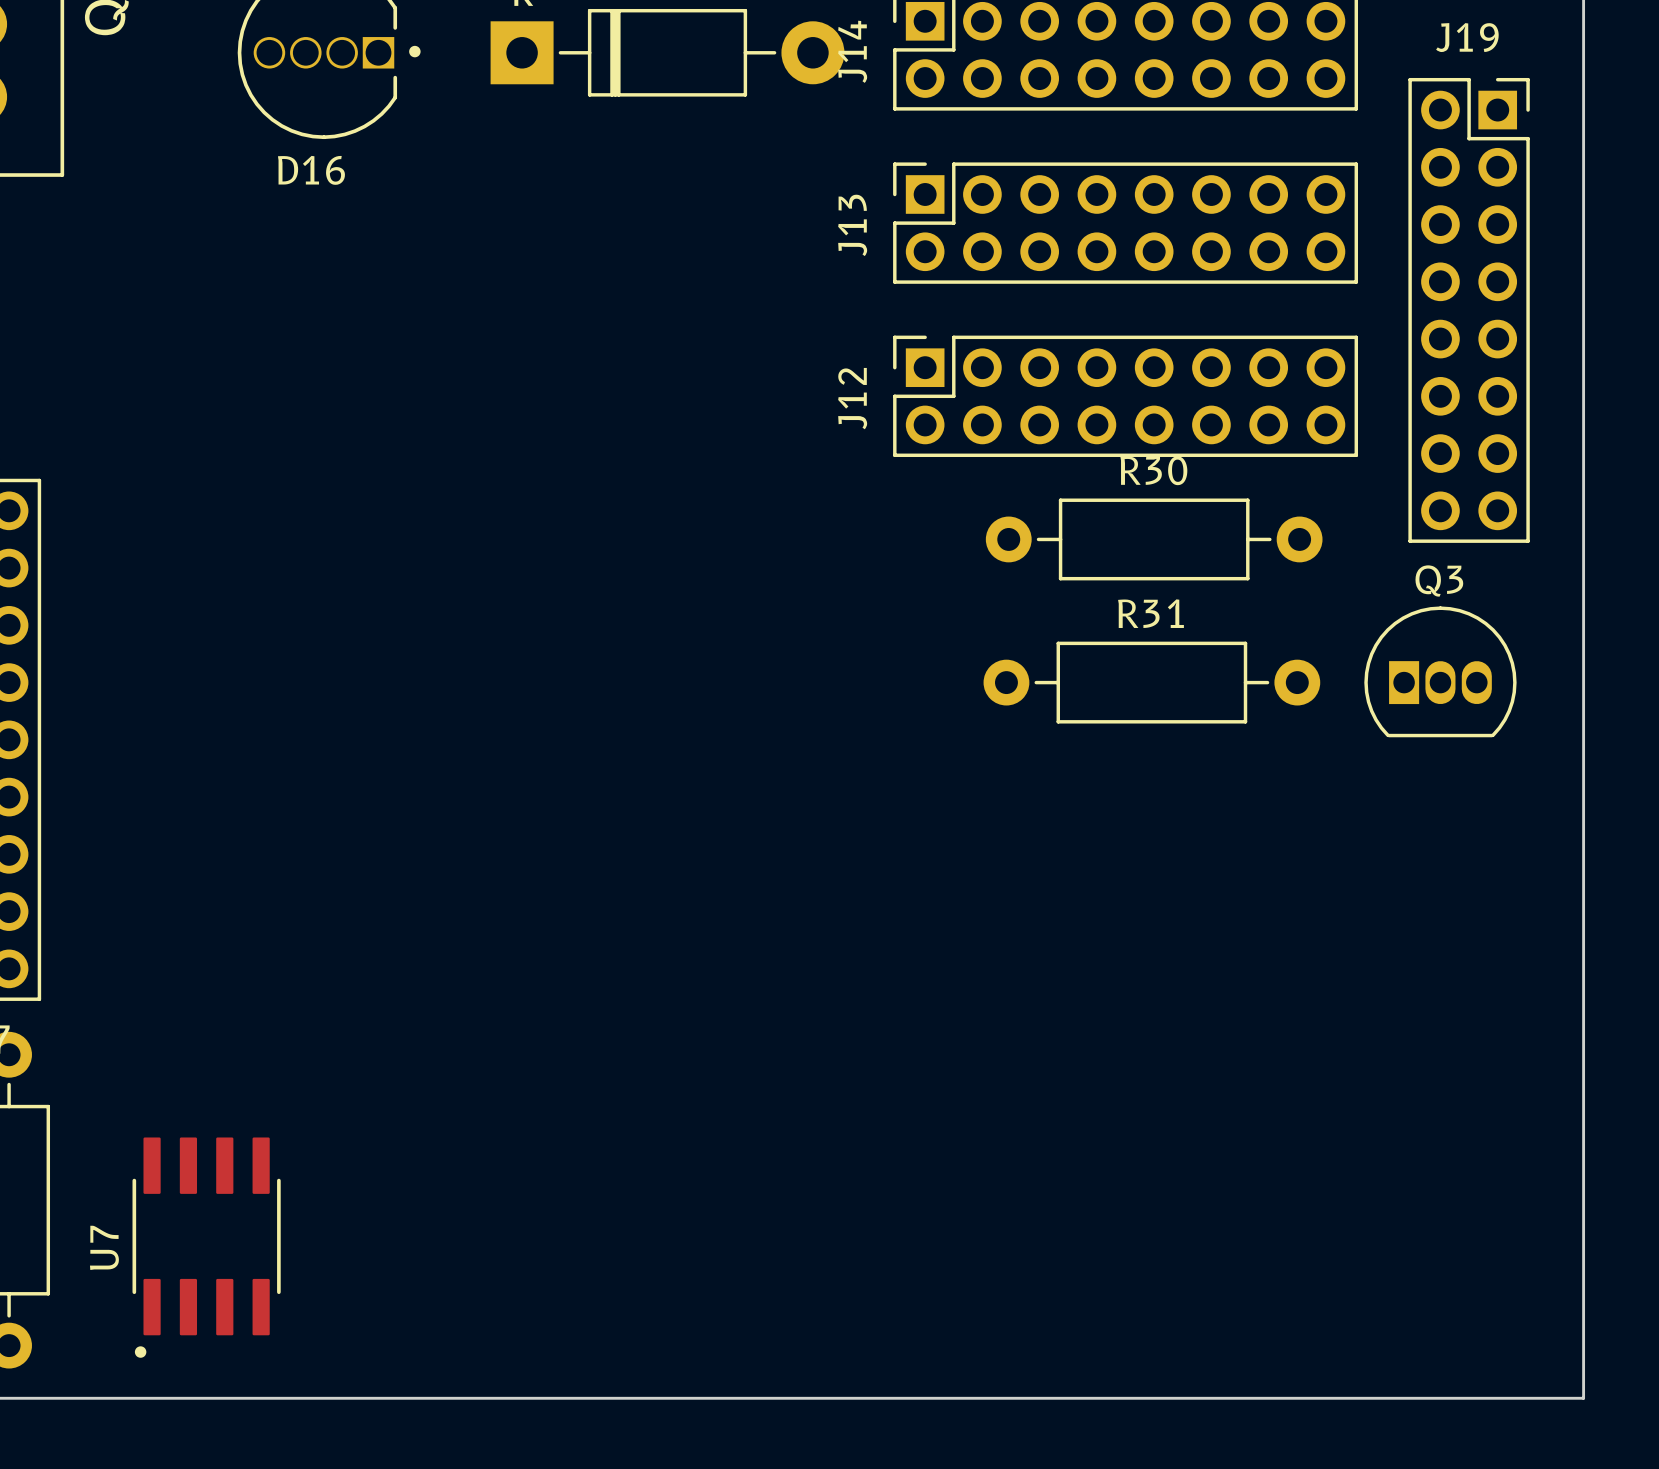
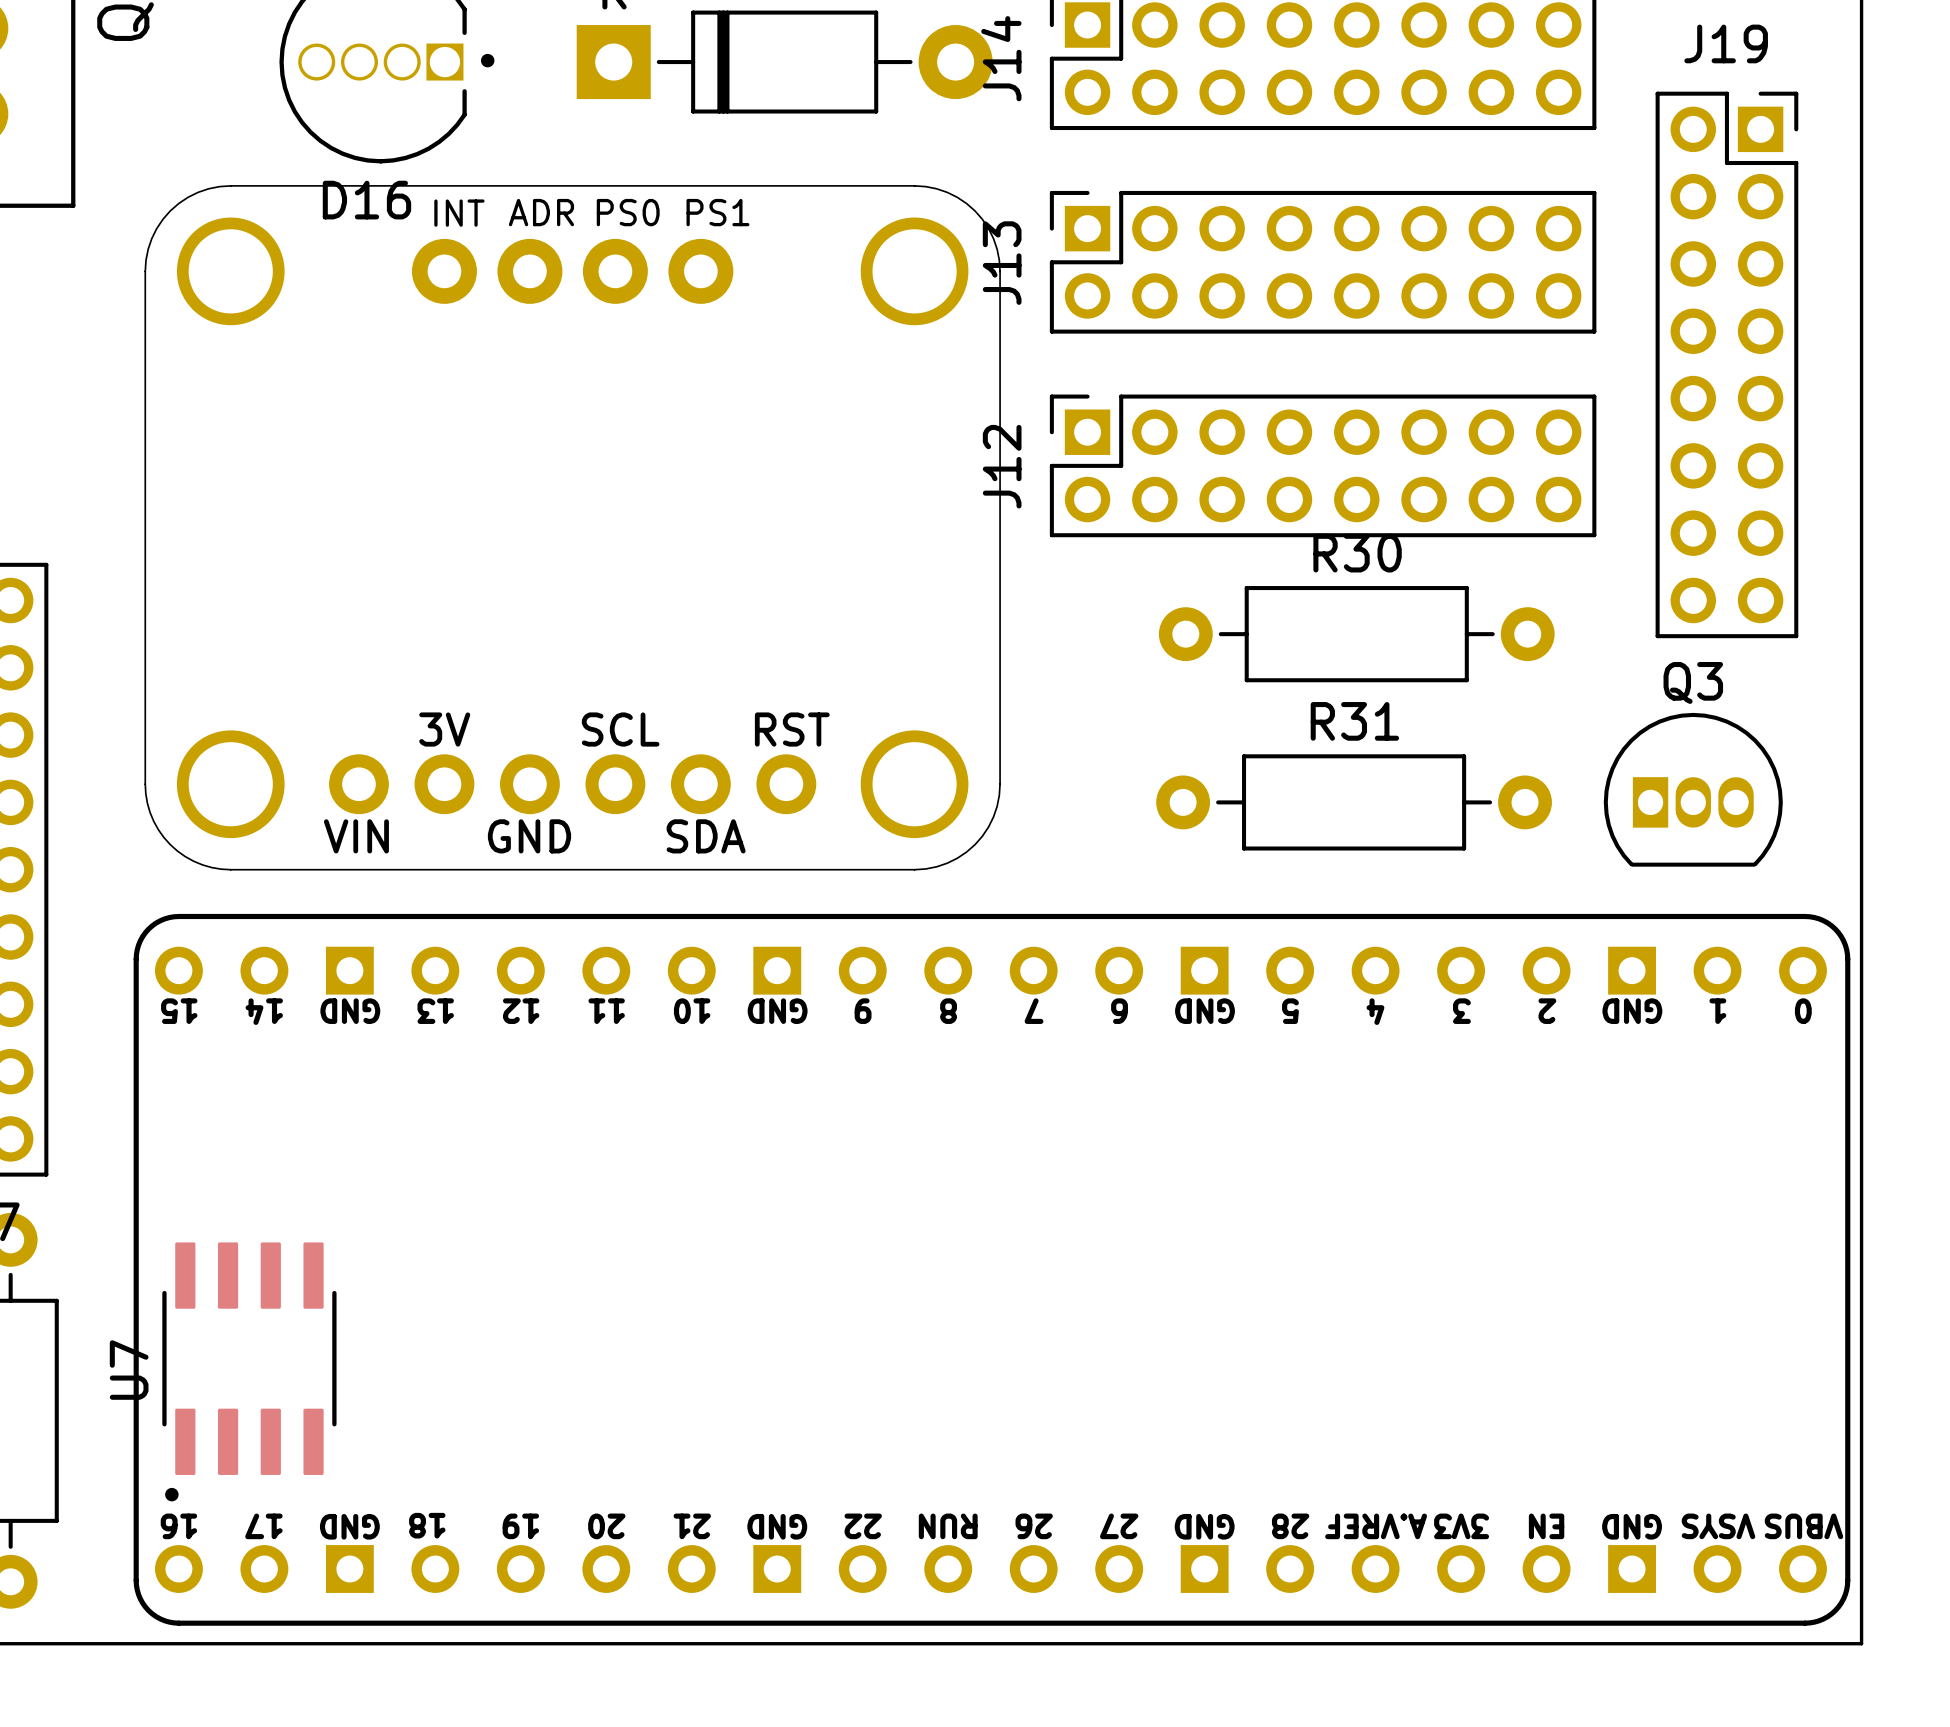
part: none -> (572, 527)
part: none -> (991, 1269)
U7 position: (206, 1247) -> (249, 1371)

